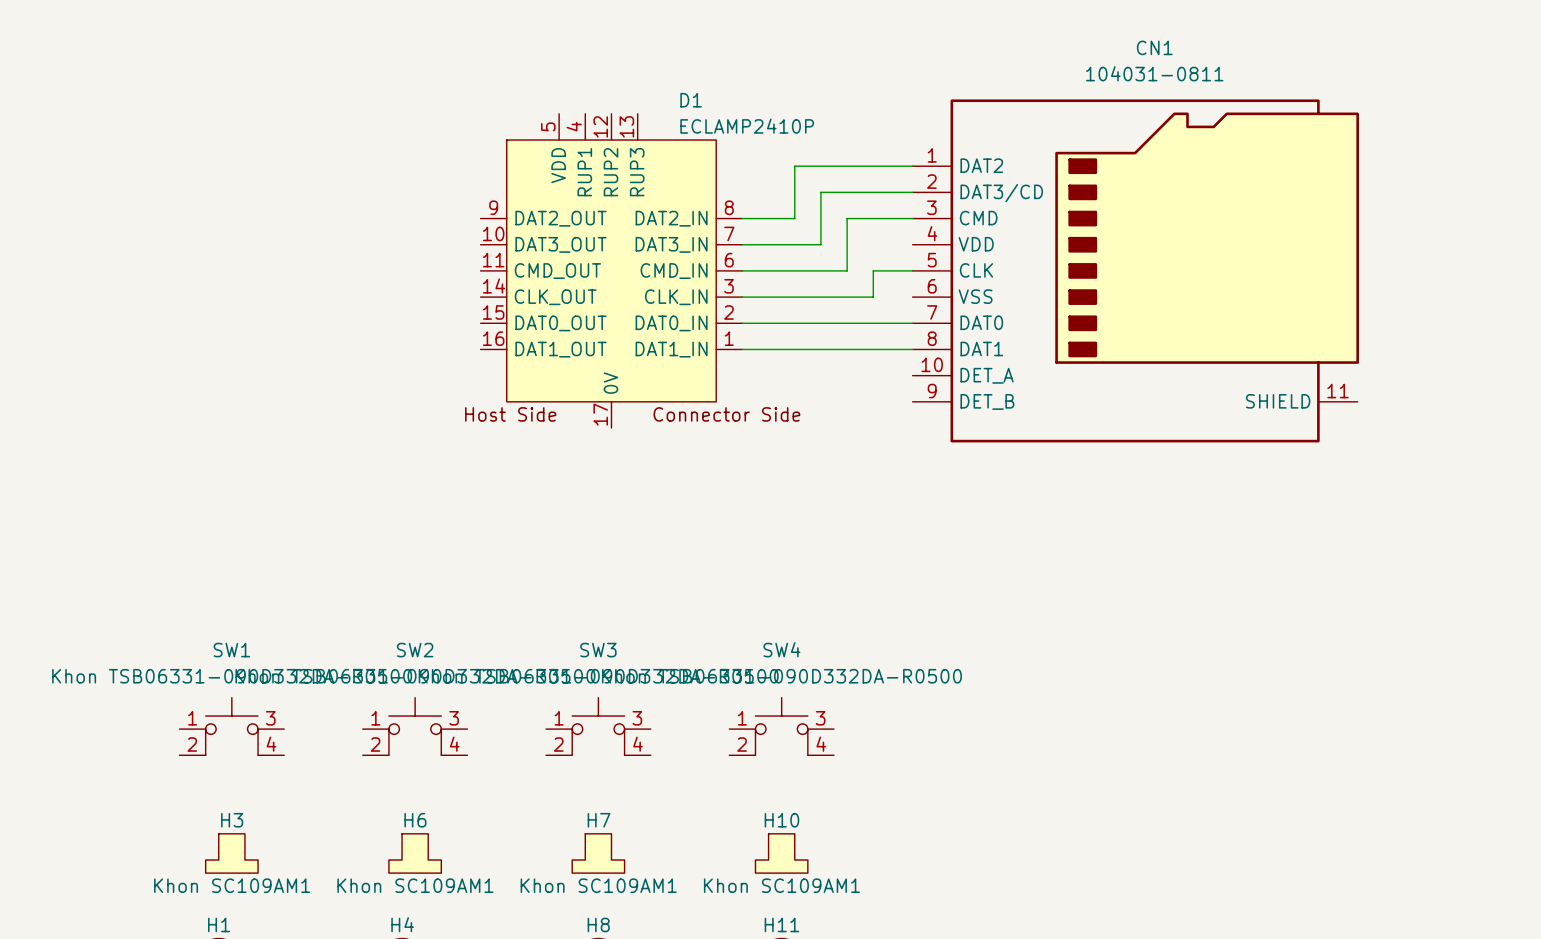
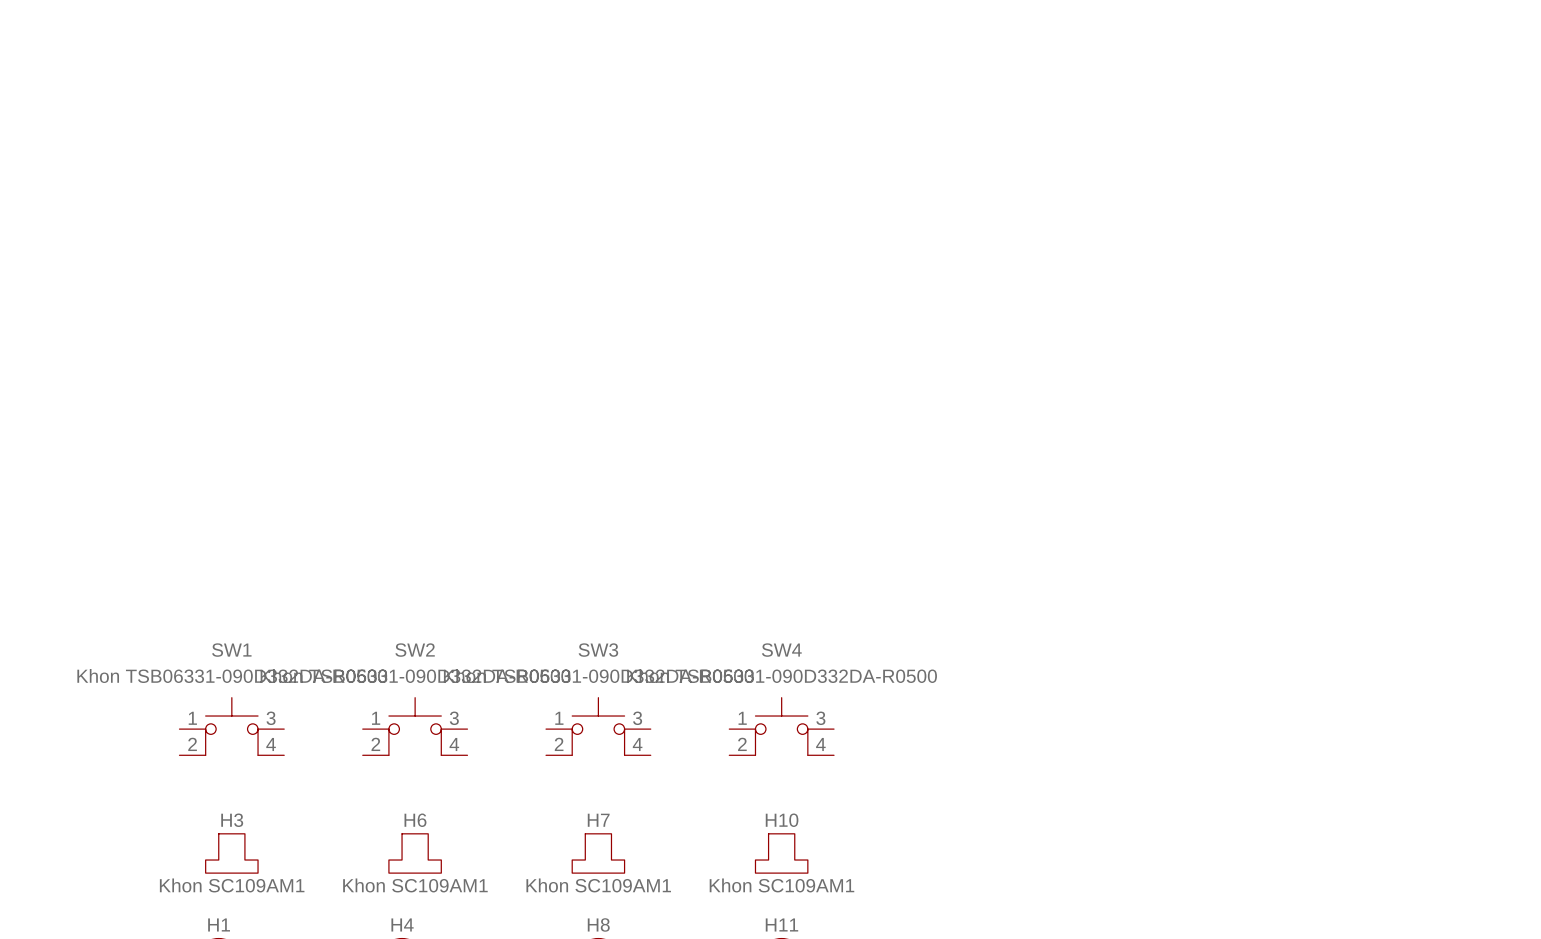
wire: (912, 166) (794, 166) (794, 218) (742, 218) -> none
wire: (912, 192) (820, 192) (820, 244) (742, 244) -> none
wire: (912, 218) (847, 218) (847, 270) (742, 270) -> none
D1: ECLAMP2410P (611, 270) -> none
wire: (912, 270) (873, 270) (873, 297) (742, 297) -> none
CN1: 104031-0811 (1135, 270) -> none
wire: (742, 323) (912, 323) -> none
wire: (742, 349) (912, 349) -> none

